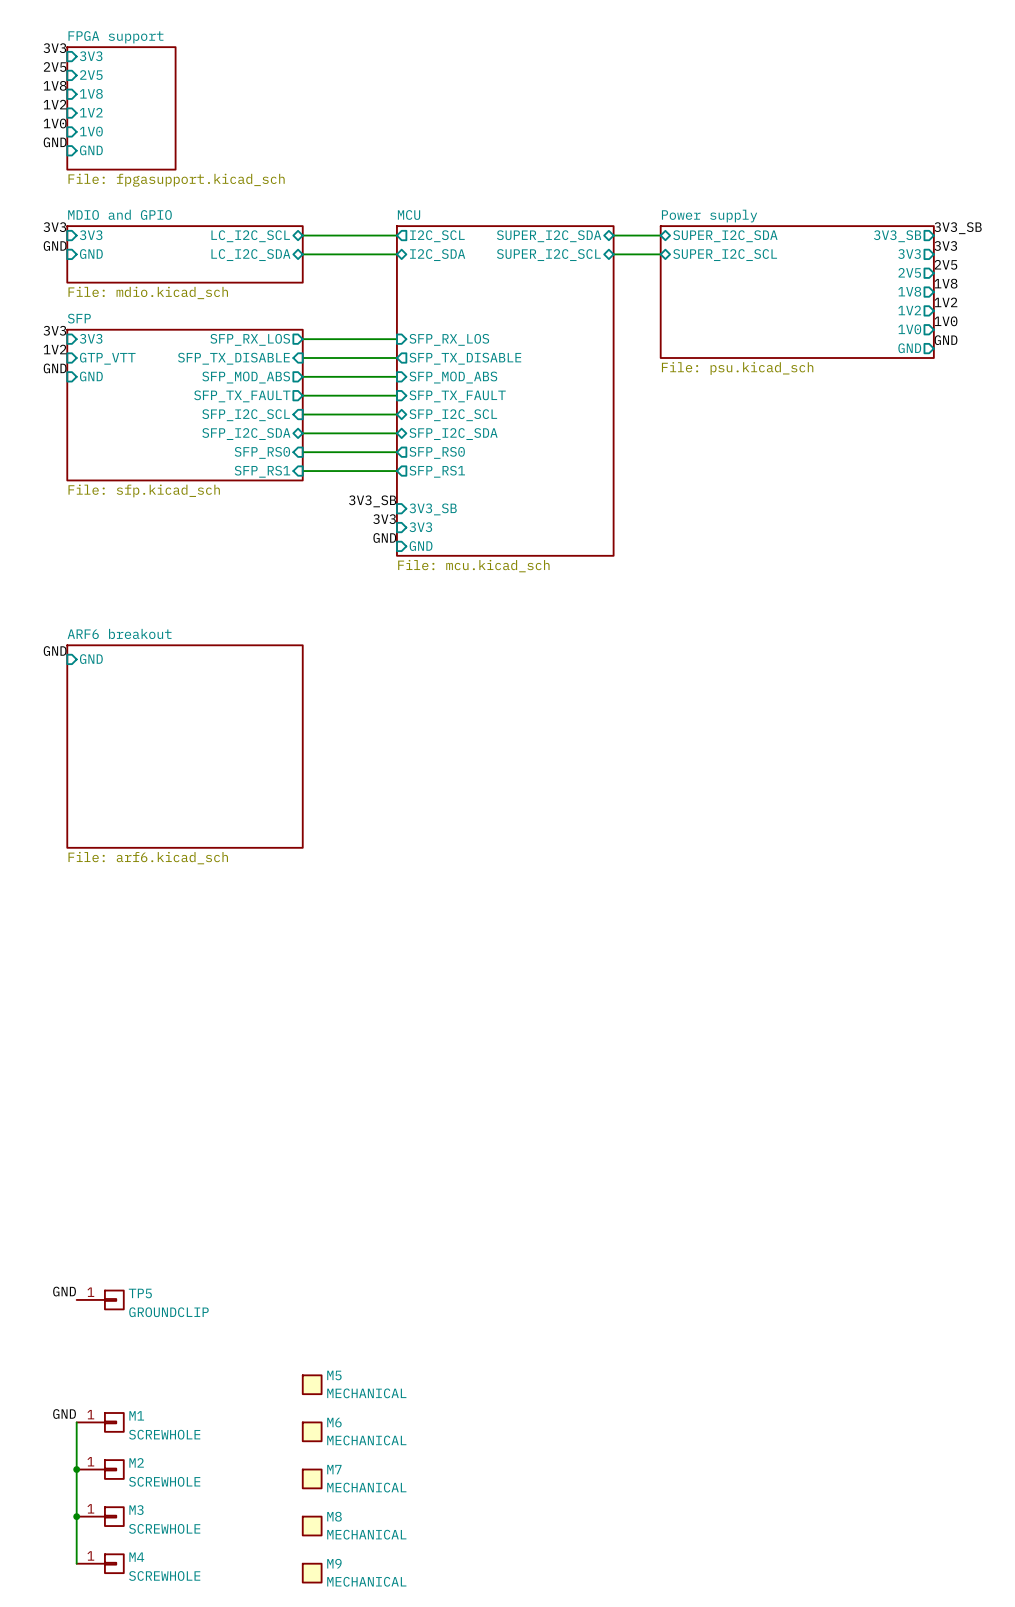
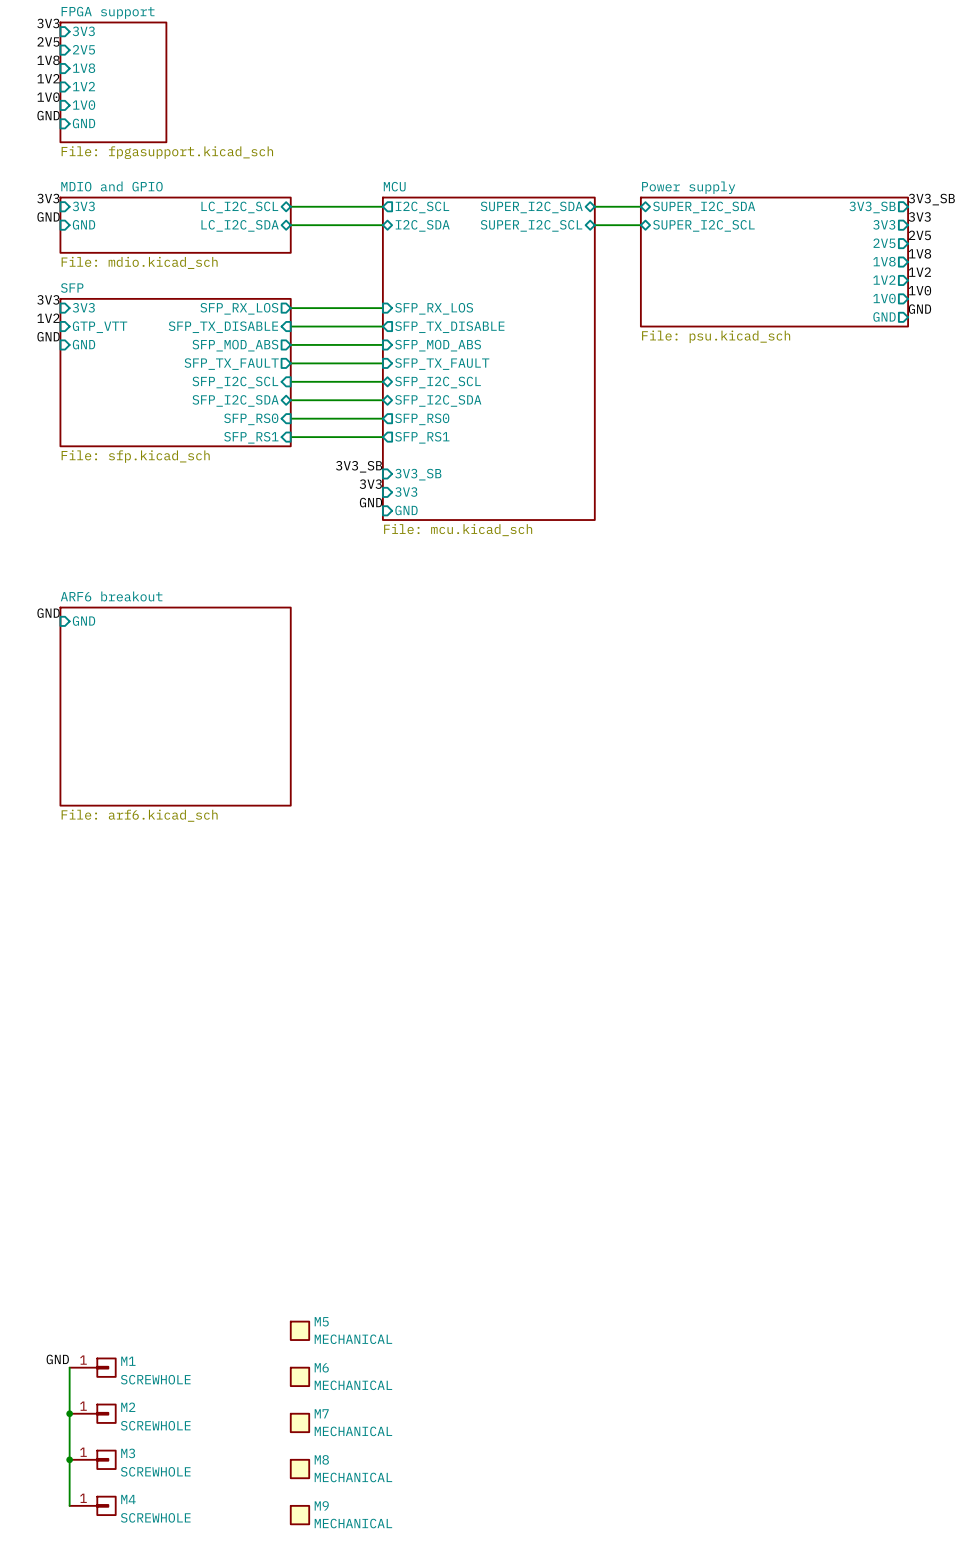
label: GND (64, 1291) -> none
TP5: GROUNDCLIP (100, 1299) -> none

